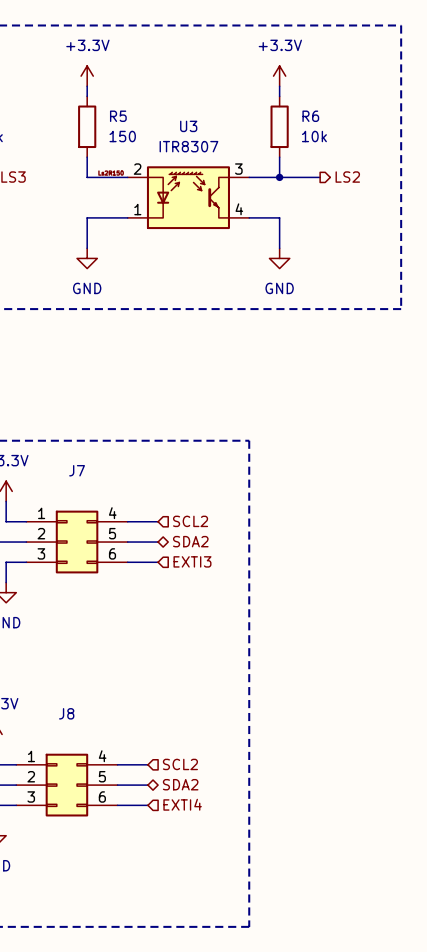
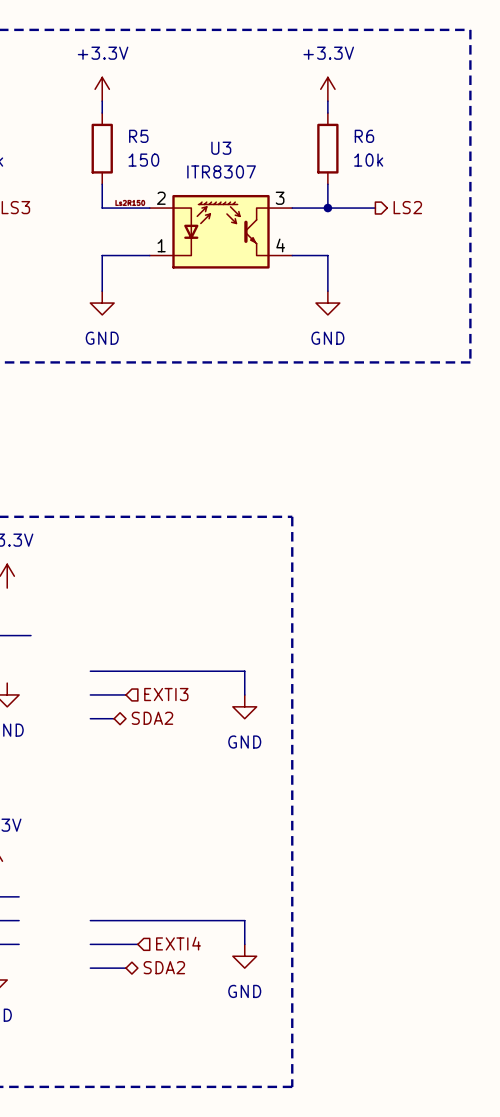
wire: (6, 501) (6, 521) (26, 521) -> none
wire: (127, 521) (158, 521) -> none
hierarchical label: SCL2 (190, 521) -> none
hierarchical label: SDA2 (190, 541) -> none
J7: (77, 542) -> none
wire: (127, 542) (158, 542) -> none
hierarchical label position: EXTI3 (192, 561) -> EXTI3 (166, 694)
wire: (26, 562) (6, 562) (6, 582) -> none
wire: (127, 562) (158, 562) -> (90, 694) (125, 694)
wire: none -> (90, 671) (244, 671) (244, 694)
power symbol: none -> GND (244, 706)
wire: none -> (90, 718) (114, 718)
hierarchical label: none -> SDA2 (152, 718)
wire: (117, 764) (147, 764) -> (90, 968) (125, 968)
hierarchical label: SCL2 (180, 764) -> none
hierarchical label position: SDA2 (180, 784) -> SDA2 (164, 967)
J8: (66, 785) -> none
wire: none -> (173, 920) (244, 920) (244, 944)
hierarchical label position: EXTI4 (182, 804) -> EXTI4 (178, 943)
power symbol: none -> GND (244, 956)

